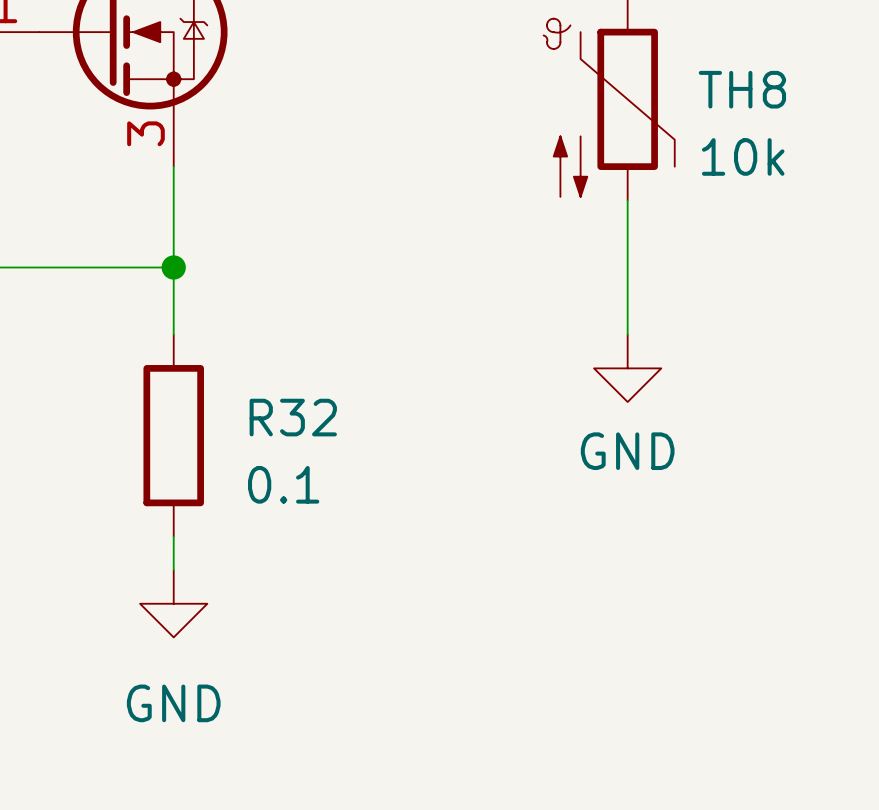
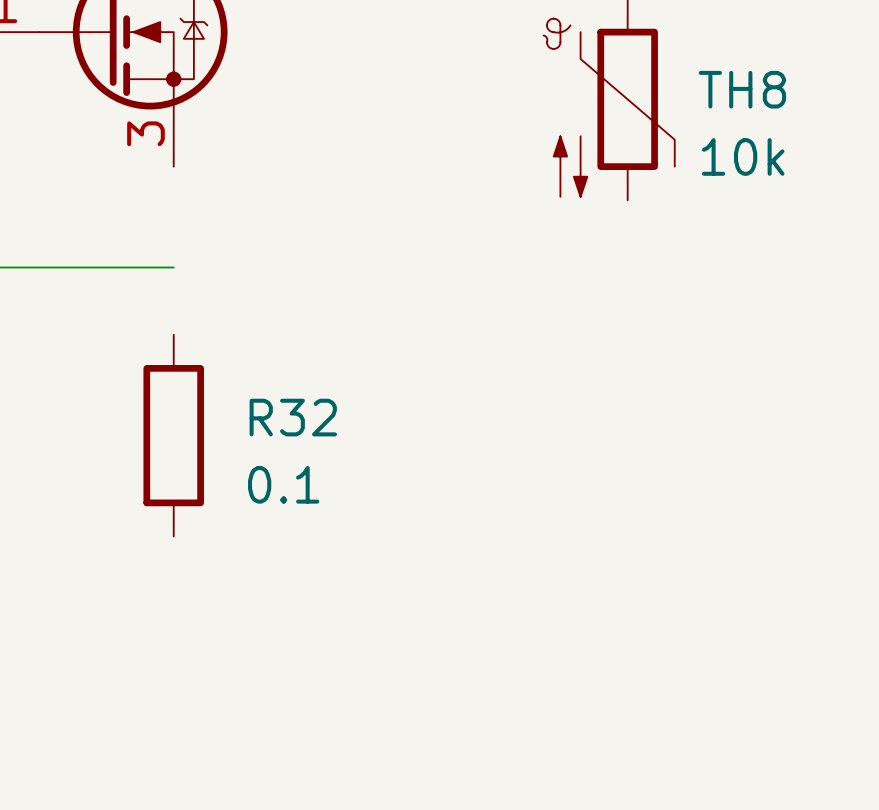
wire: (173, 166) (173, 334) -> none
wire: (627, 200) (627, 334) -> none
junction: (173, 267) -> none
power symbol: GND (627, 368) -> none
wire: (173, 536) (173, 570) -> none
power symbol: GND (173, 603) -> none

